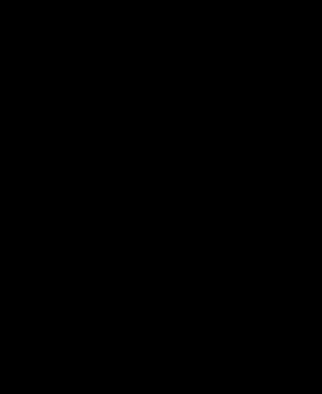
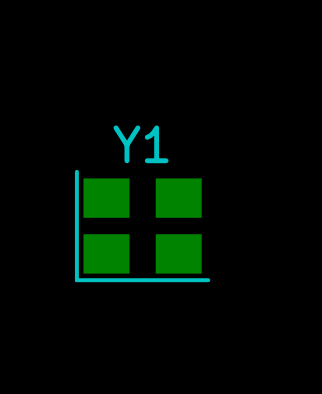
Y1: none -> (142, 226)

